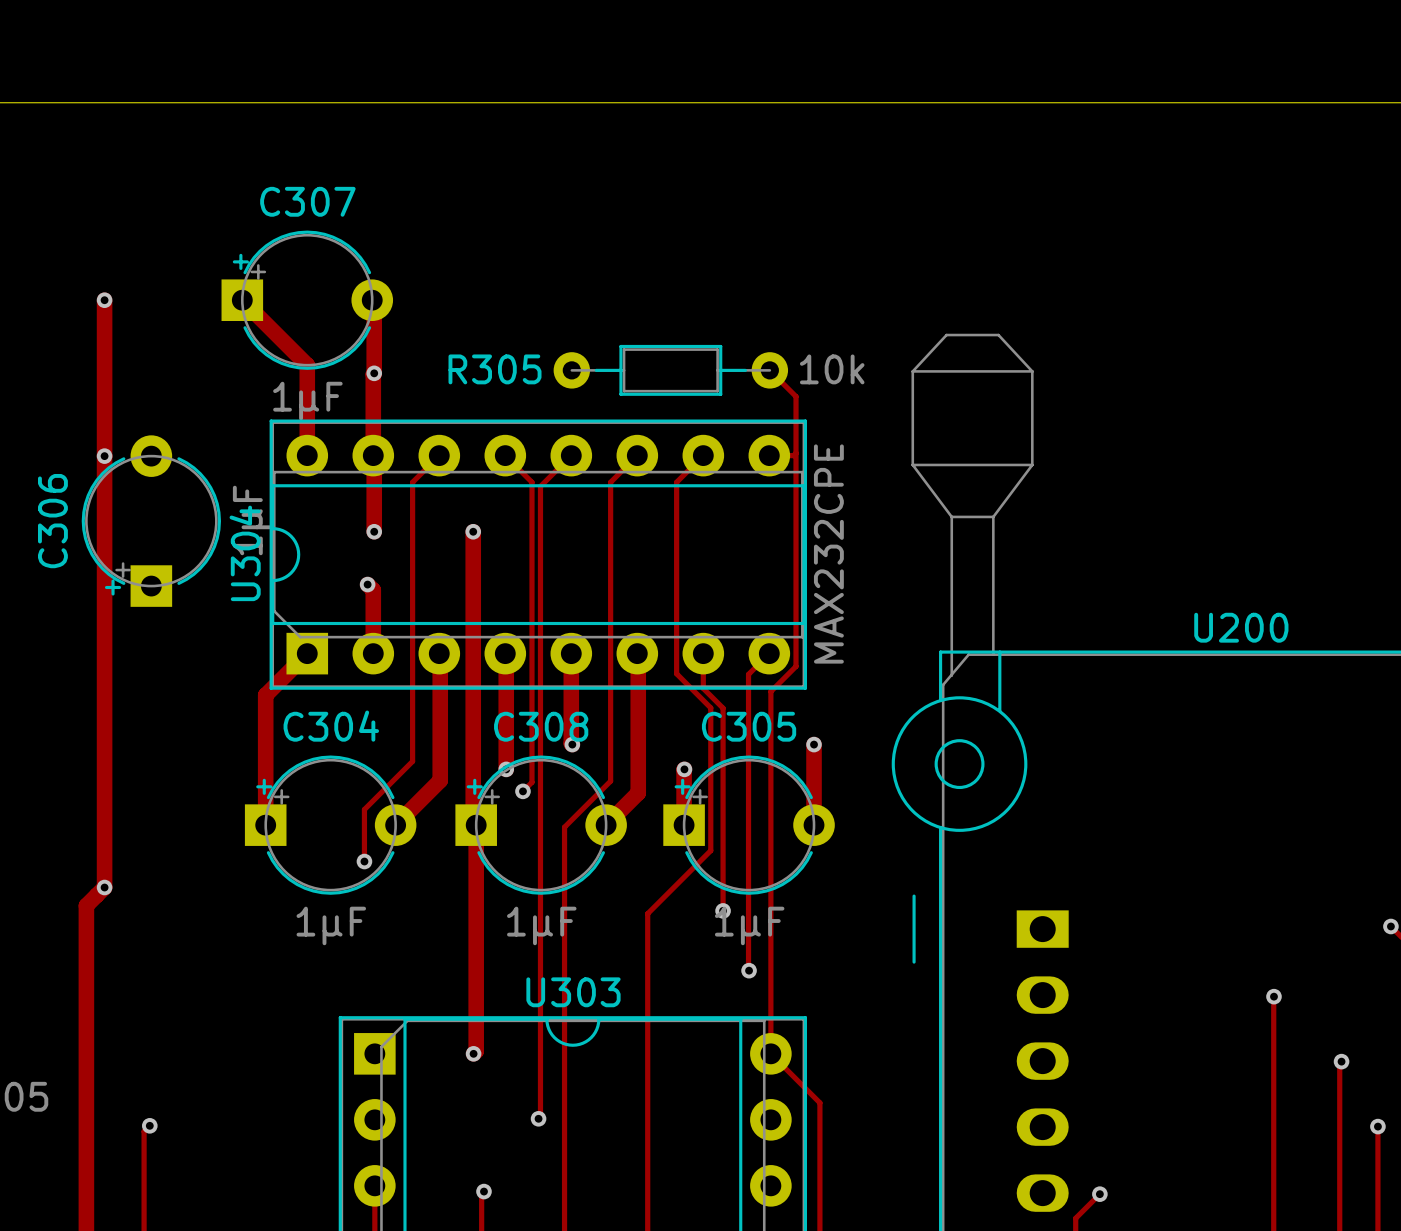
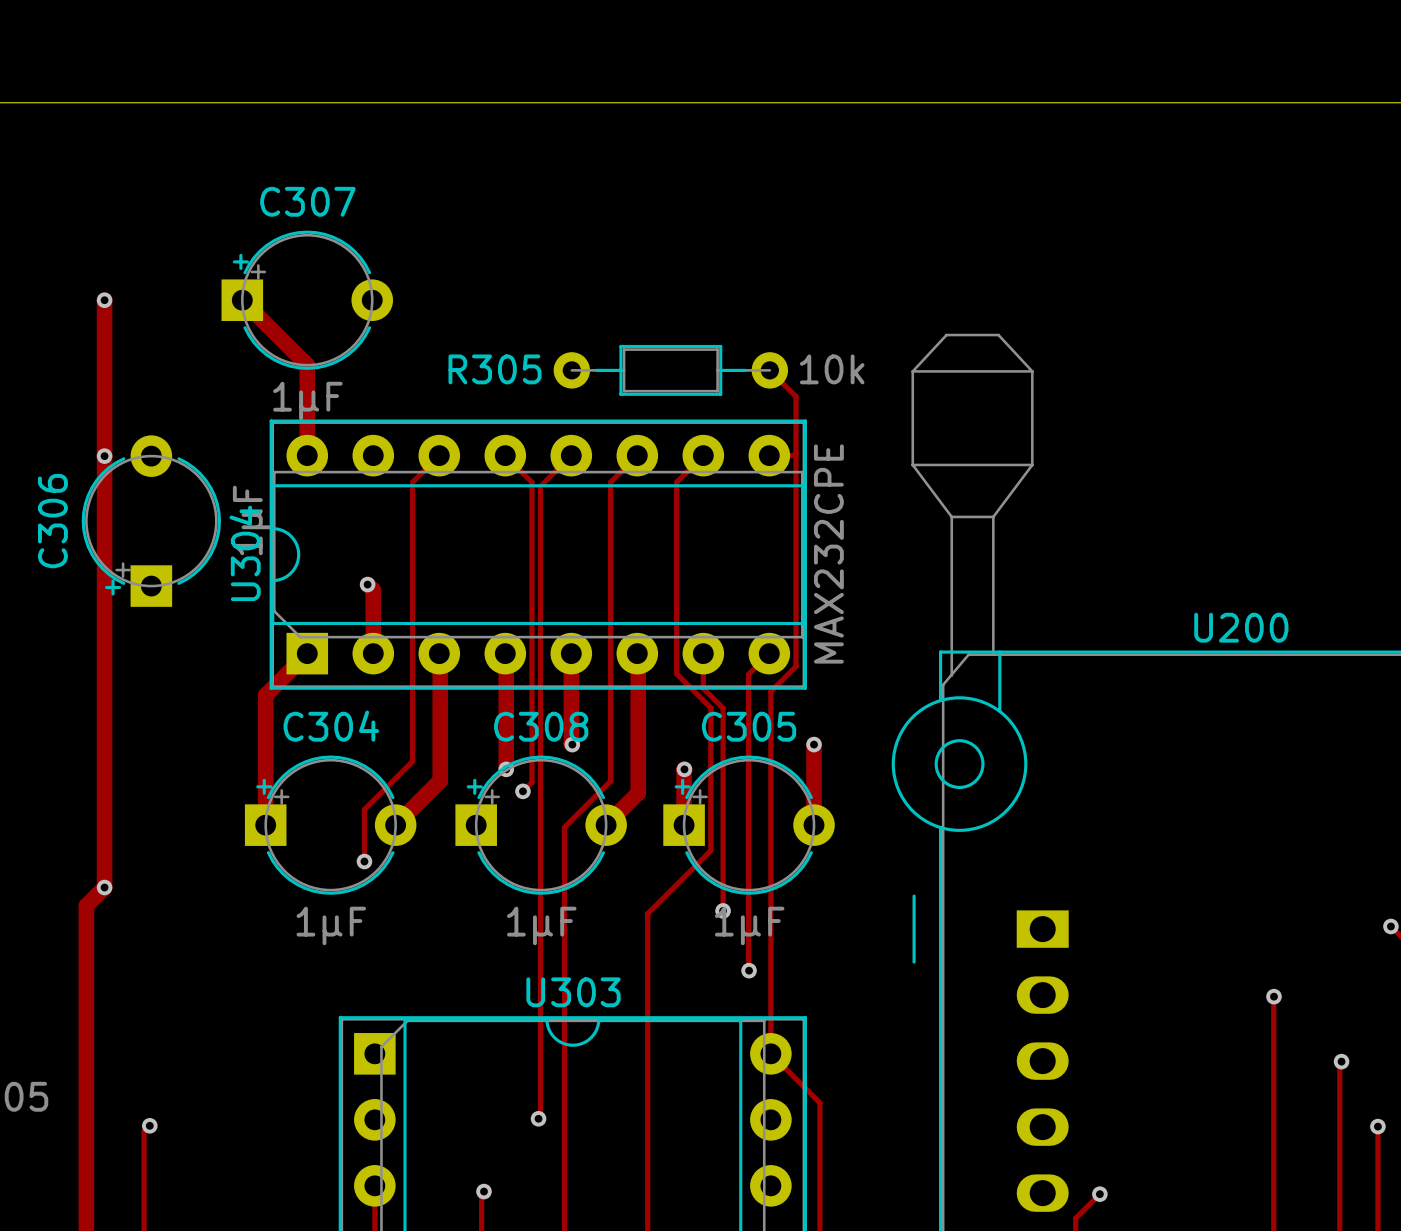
track: (374, 302) (373, 455) -> none
via: (374, 373) -> none
track: (374, 456) (374, 531) -> none
via: (374, 531) -> none
track: (473, 531) (473, 822) -> none
via: (473, 531) -> none
track: (476, 825) (476, 1051) (473, 1053) -> none
via: (473, 1053) -> none

